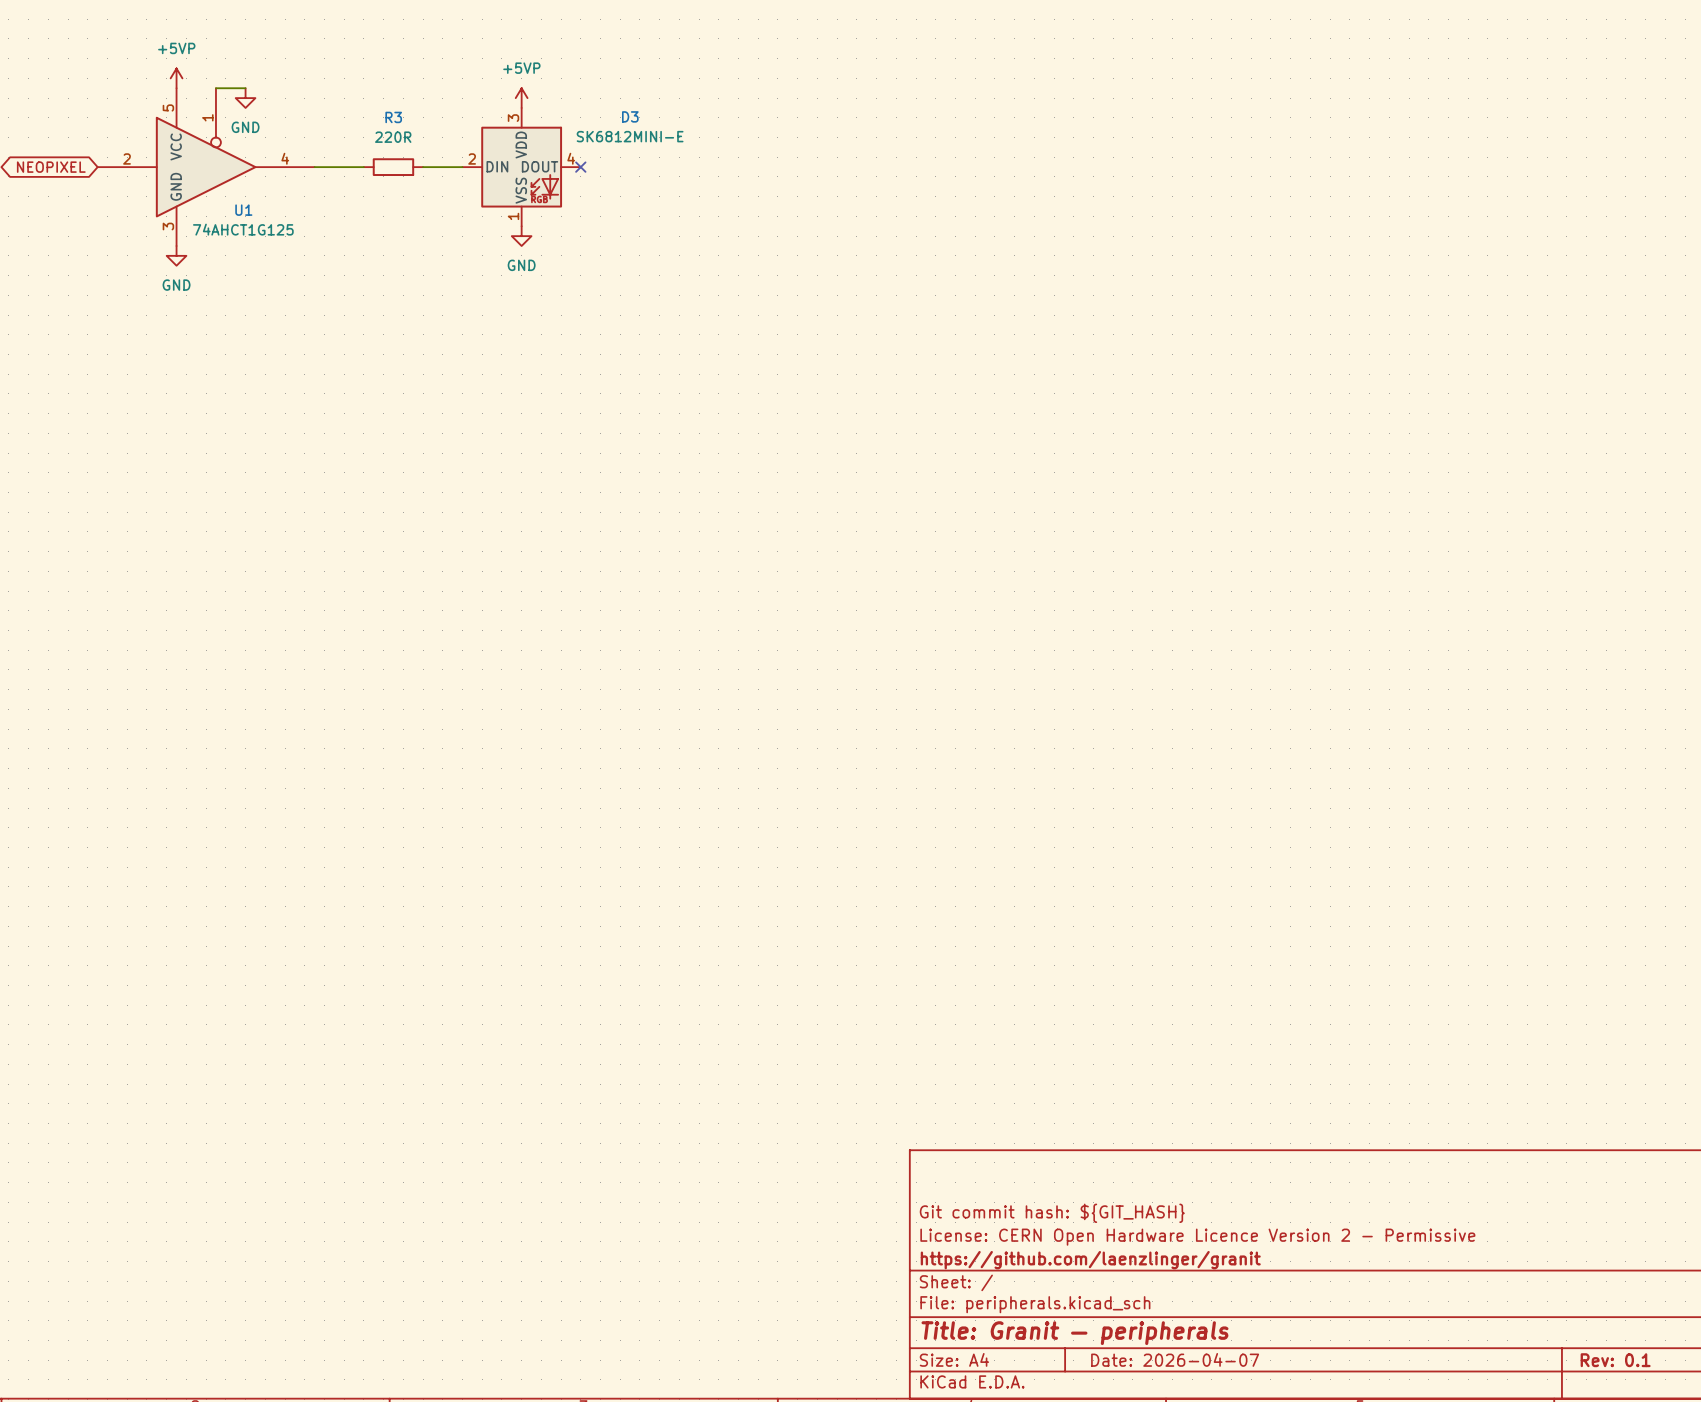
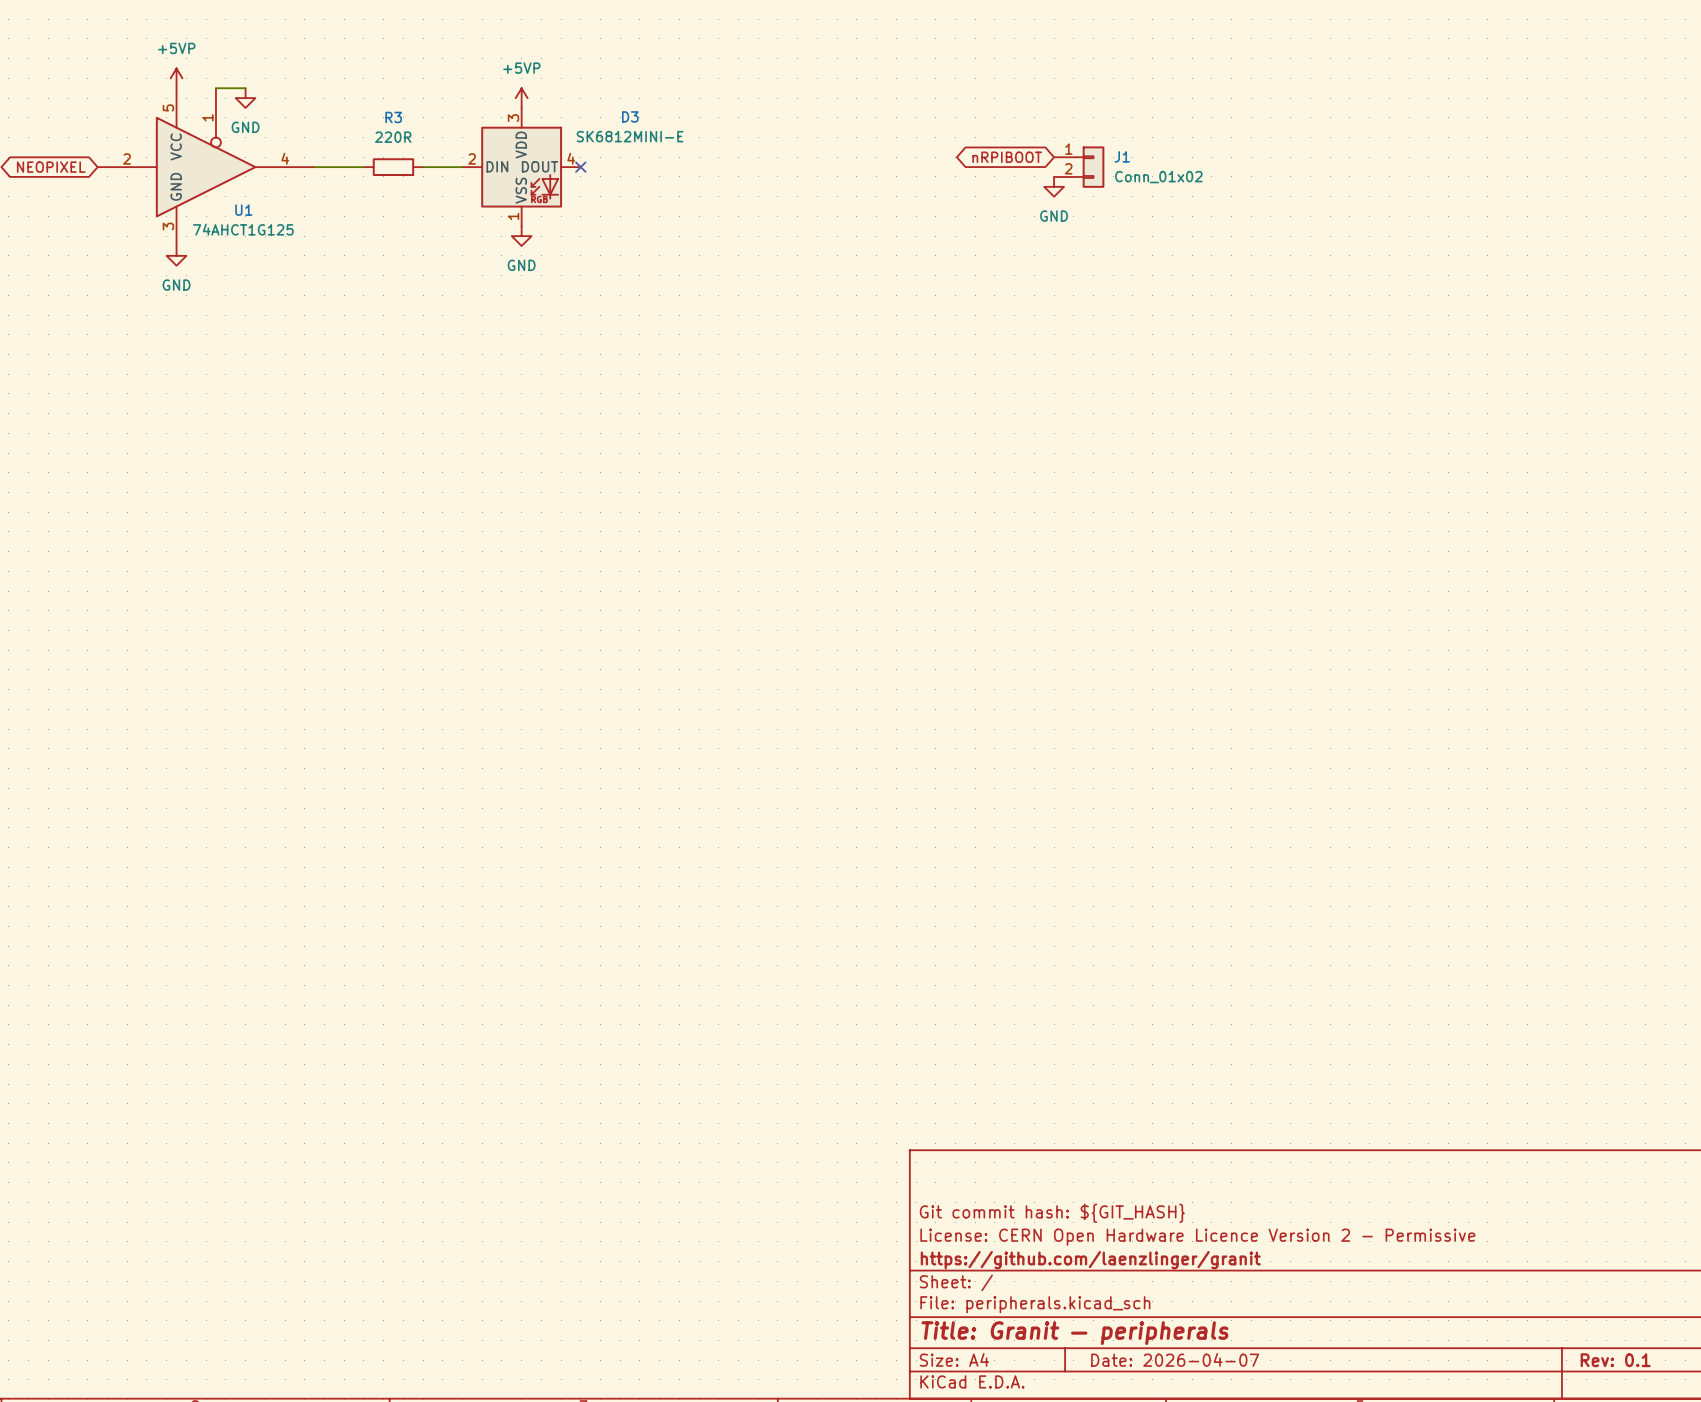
global label: none -> nRPIBOOT (1007, 157)
J1: none -> Conn_01x02 (1079, 167)
power symbol: none -> GND (1054, 186)

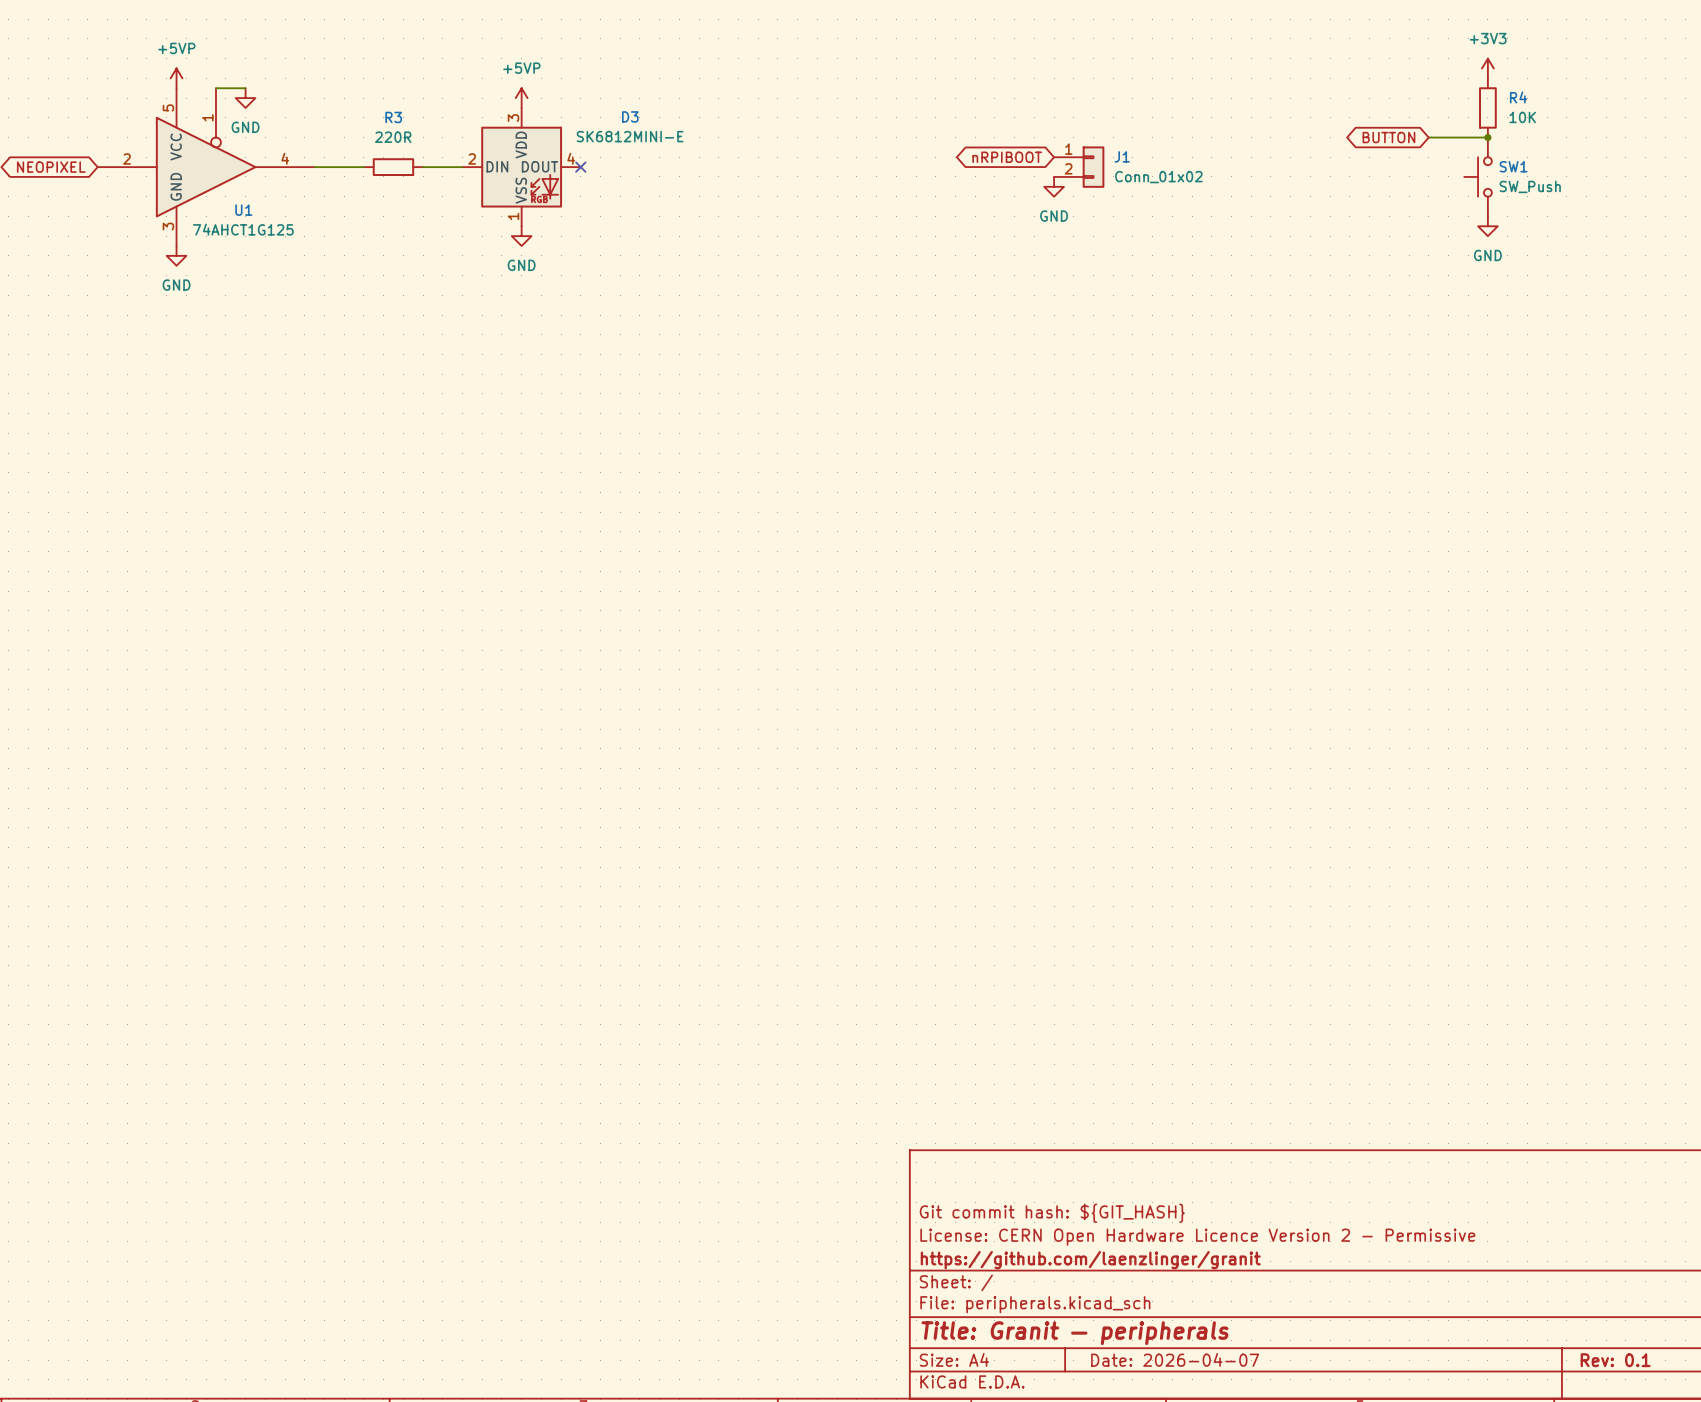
power symbol: none -> +3V3 (1487, 68)
R4: none -> 10K (1487, 107)
global label: none -> BUTTON (1388, 137)
wire: none -> (1428, 137) (1487, 137)
junction: none -> (1487, 137)
SW1: none -> SW_Push (1478, 176)
power symbol: none -> GND (1487, 226)

